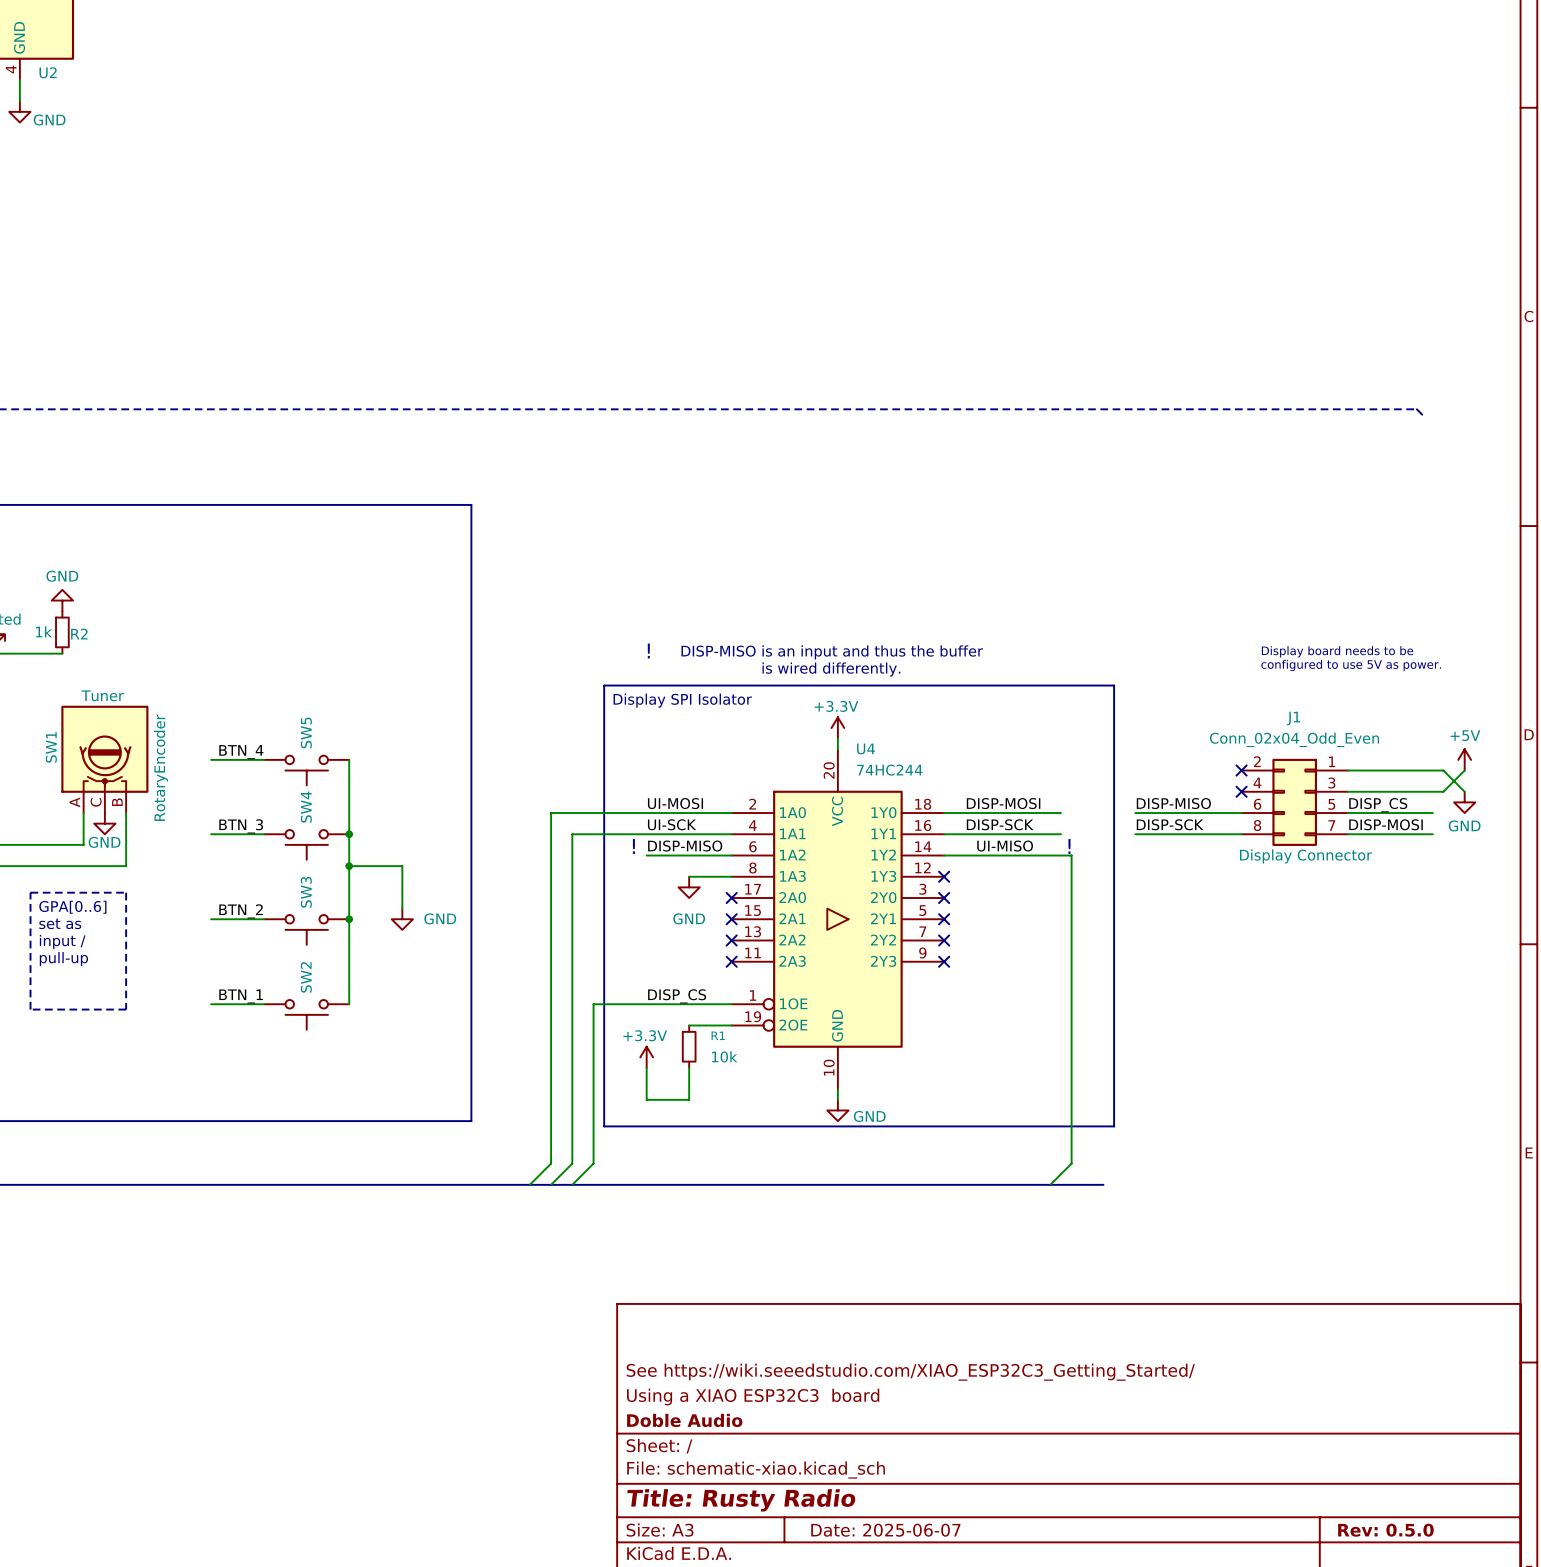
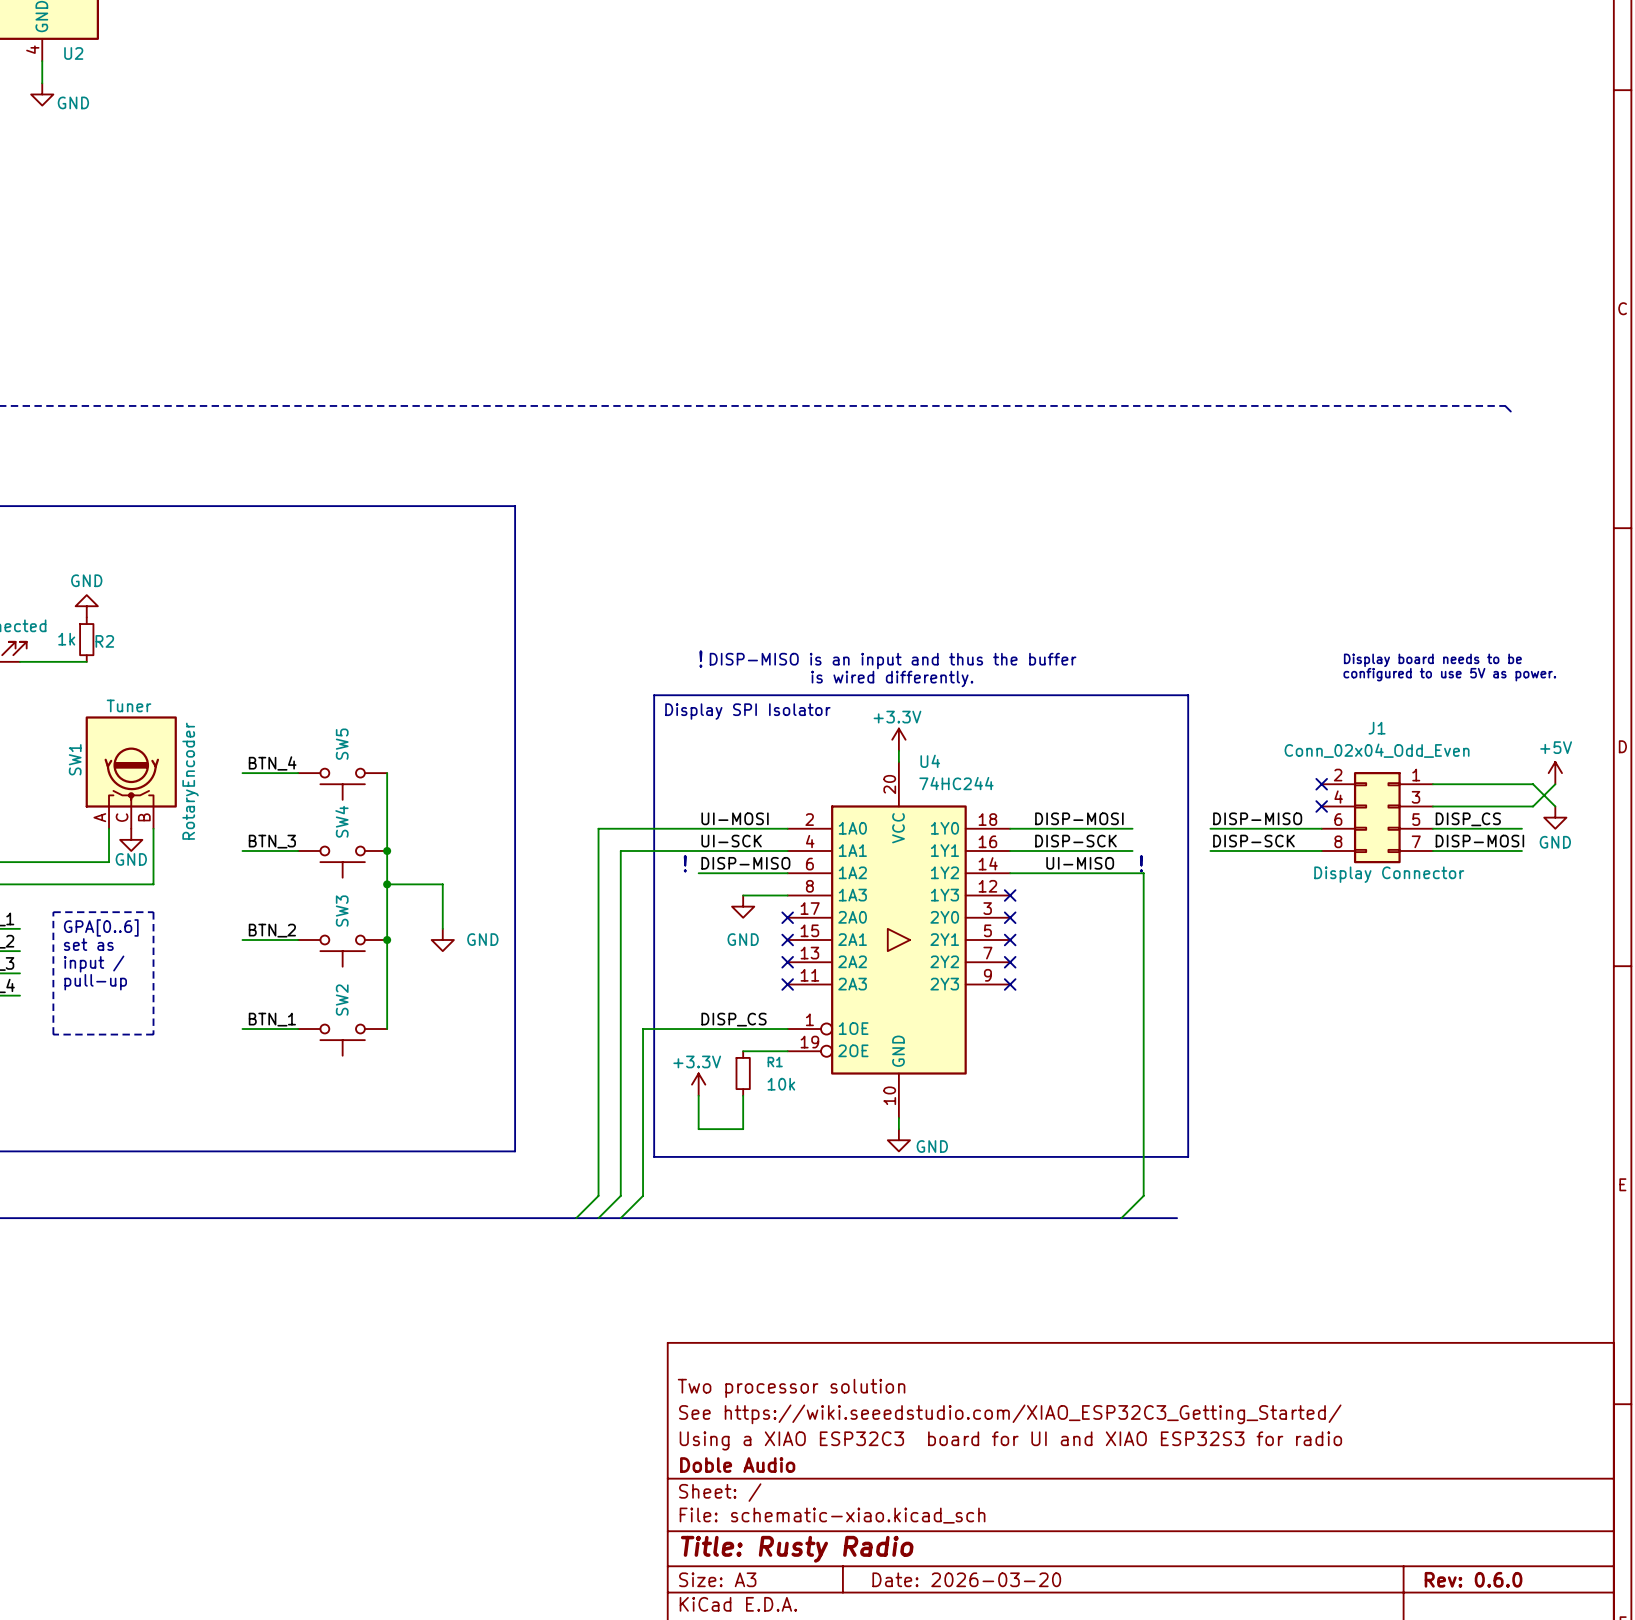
title block: none -> Two processor solution (791, 1388)
title block: Using a XIAO ESP32C3 board (753, 1397) -> Using a XIAO ESP32C3 board for UI and XIAO ESP32S3 for radio (1010, 1440)
title block: Date: 2025-06-07 (885, 1530) -> Date: 2026-03-20 (966, 1579)
title block: Rev: 0.5.0 (1385, 1530) -> Rev: 0.6.0 (1473, 1579)

